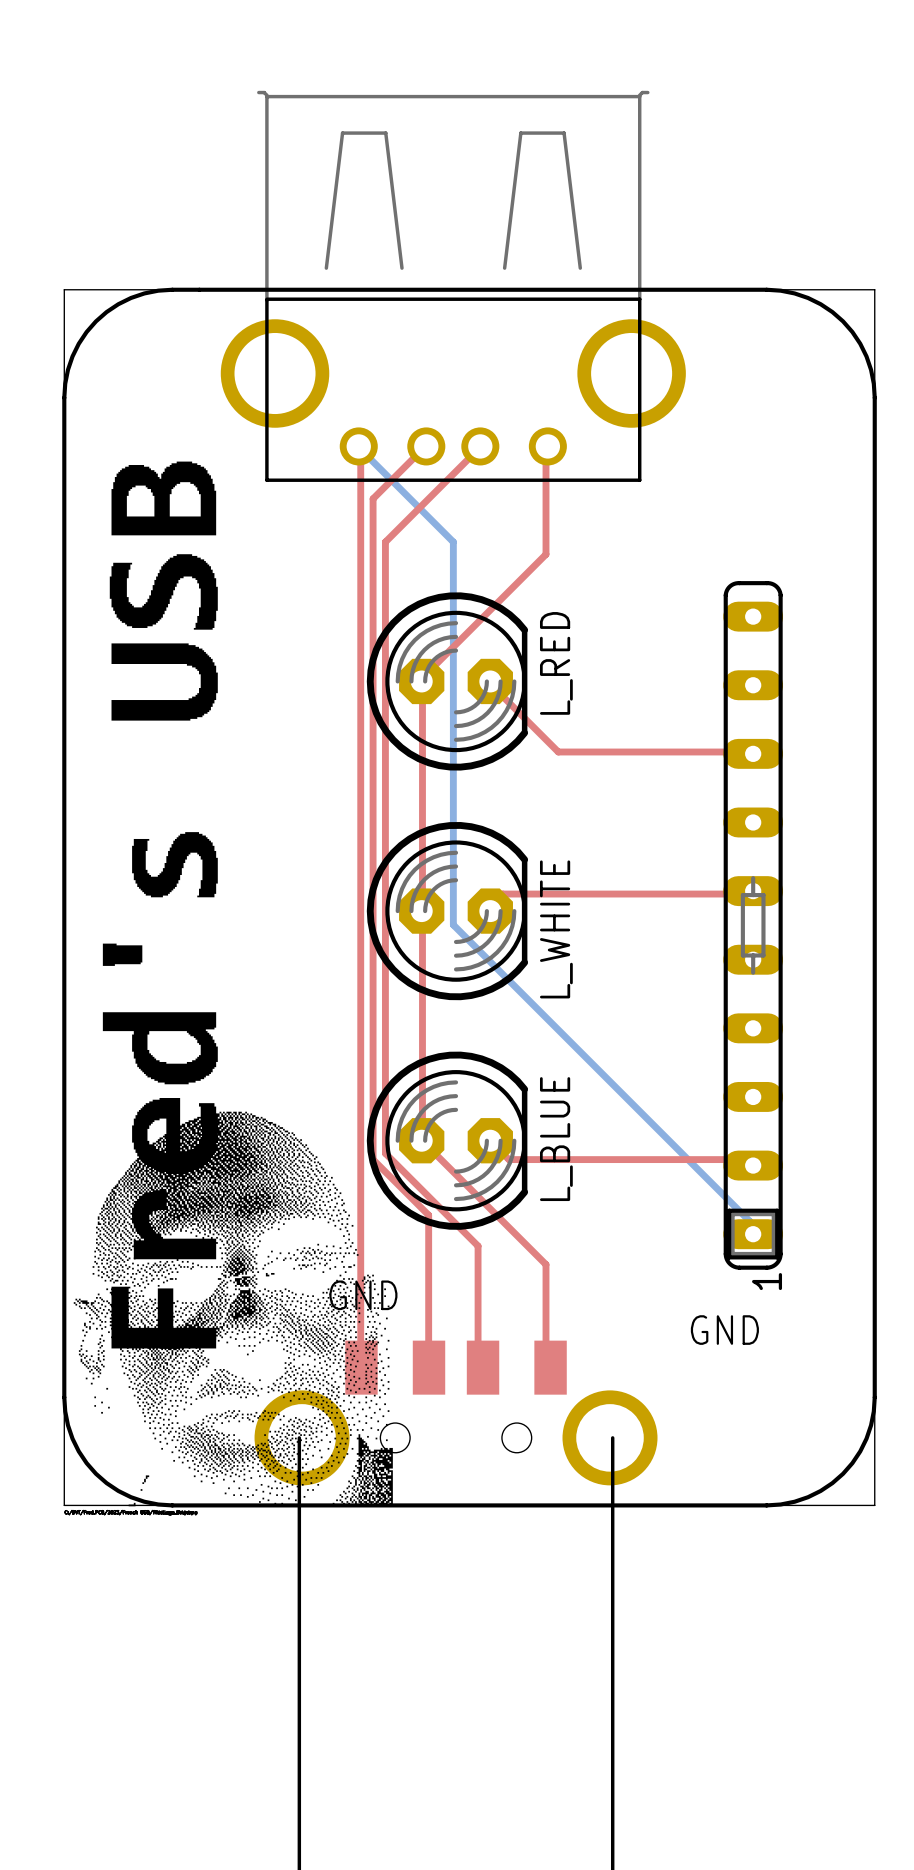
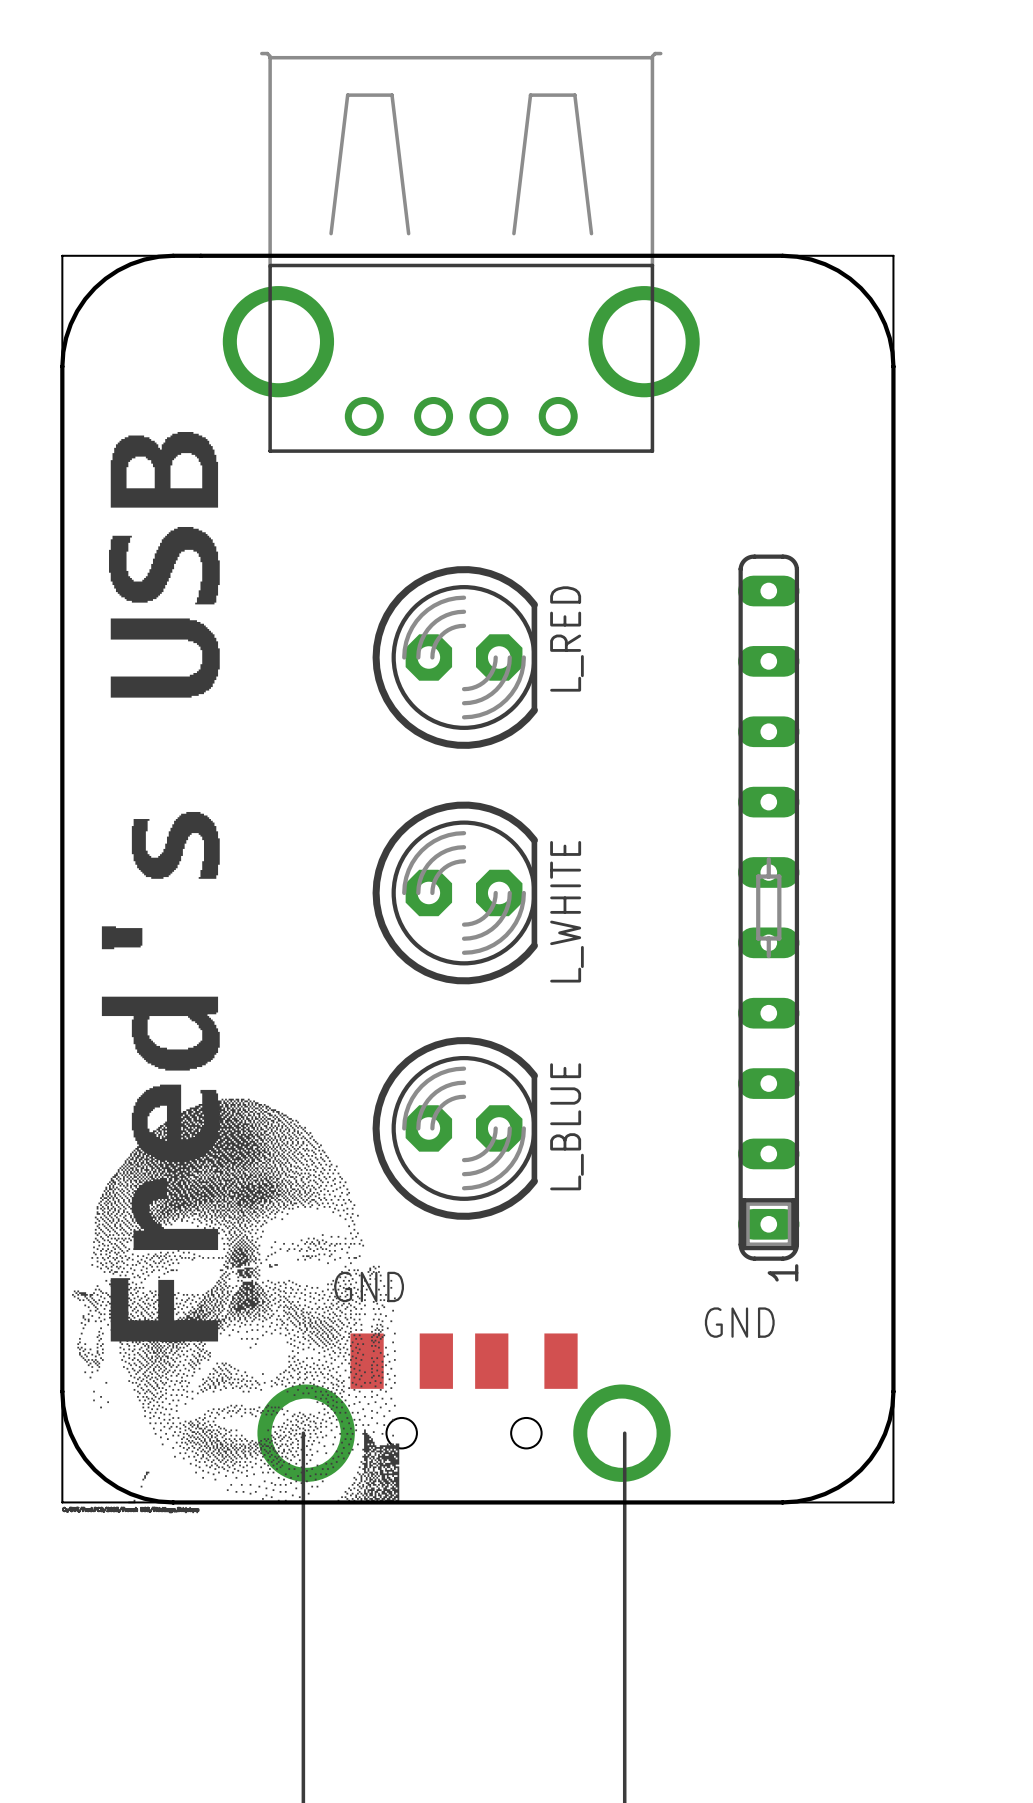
top track: (358, 446) (360, 449) (361, 1367) -> none
bottom track: (358, 446) (453, 542) (453, 924) (749, 1221) (749, 1233) (753, 1234) -> none
top track: (426, 446) (373, 498) (373, 1159) (428, 1215) (429, 1367) -> none
top track: (480, 446) (385, 542) (385, 1153) (478, 1246) (478, 1363) (483, 1367) -> none
top track: (547, 446) (546, 449) (546, 554) (422, 677) (421, 681) (421, 1140) (546, 1264) (546, 1363) (550, 1367) -> none
top track: (490, 681) (490, 684) (558, 752) (749, 752) (753, 753) -> none
top track: (753, 891) (749, 894) (502, 894) (490, 906) (490, 911) -> none
top track: (490, 1141) (508, 1159) (749, 1159) (753, 1165) -> none

